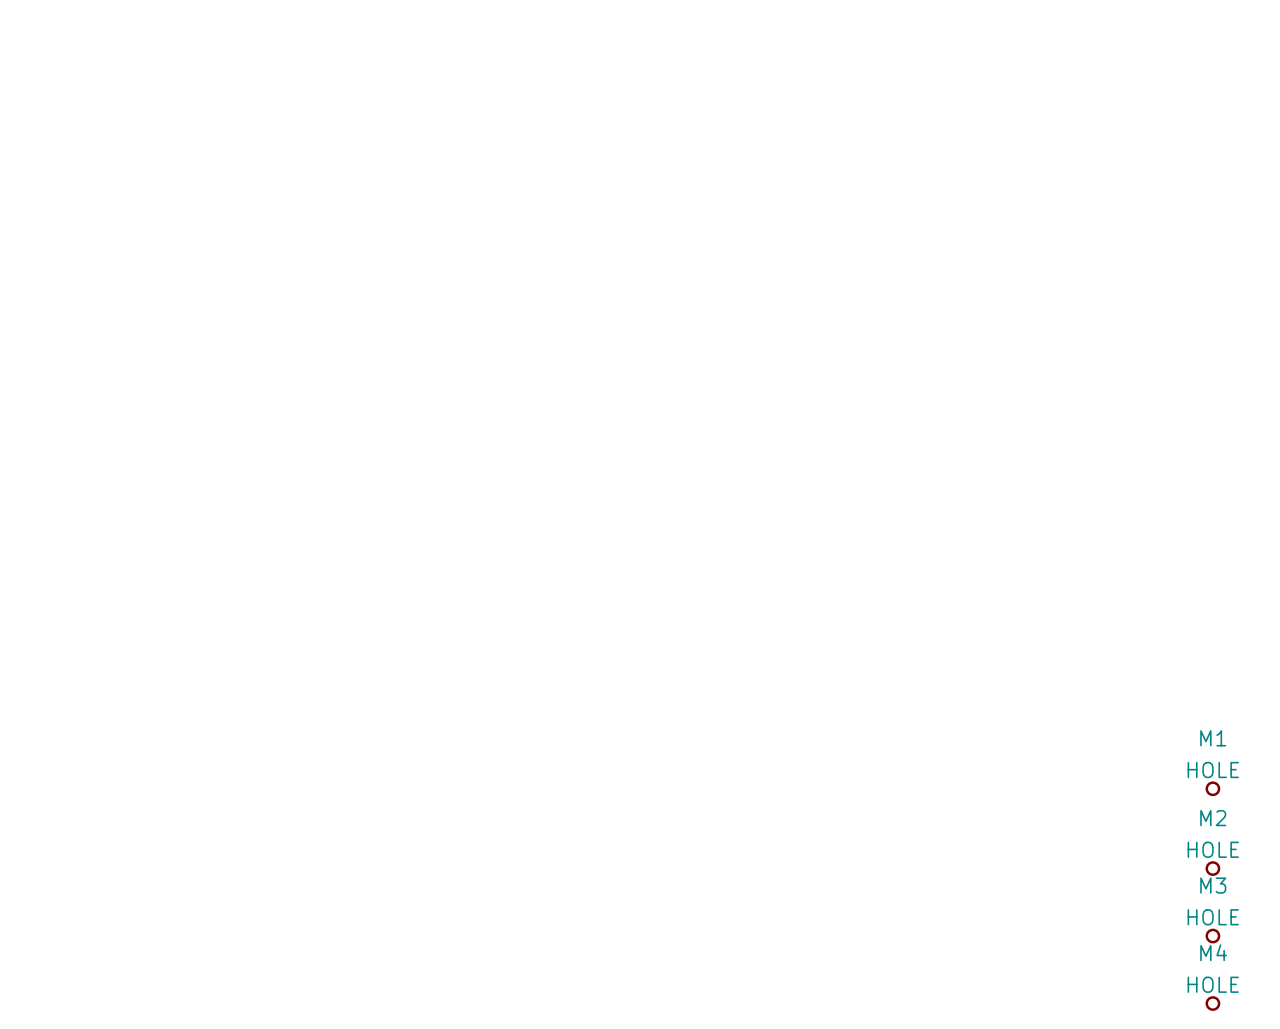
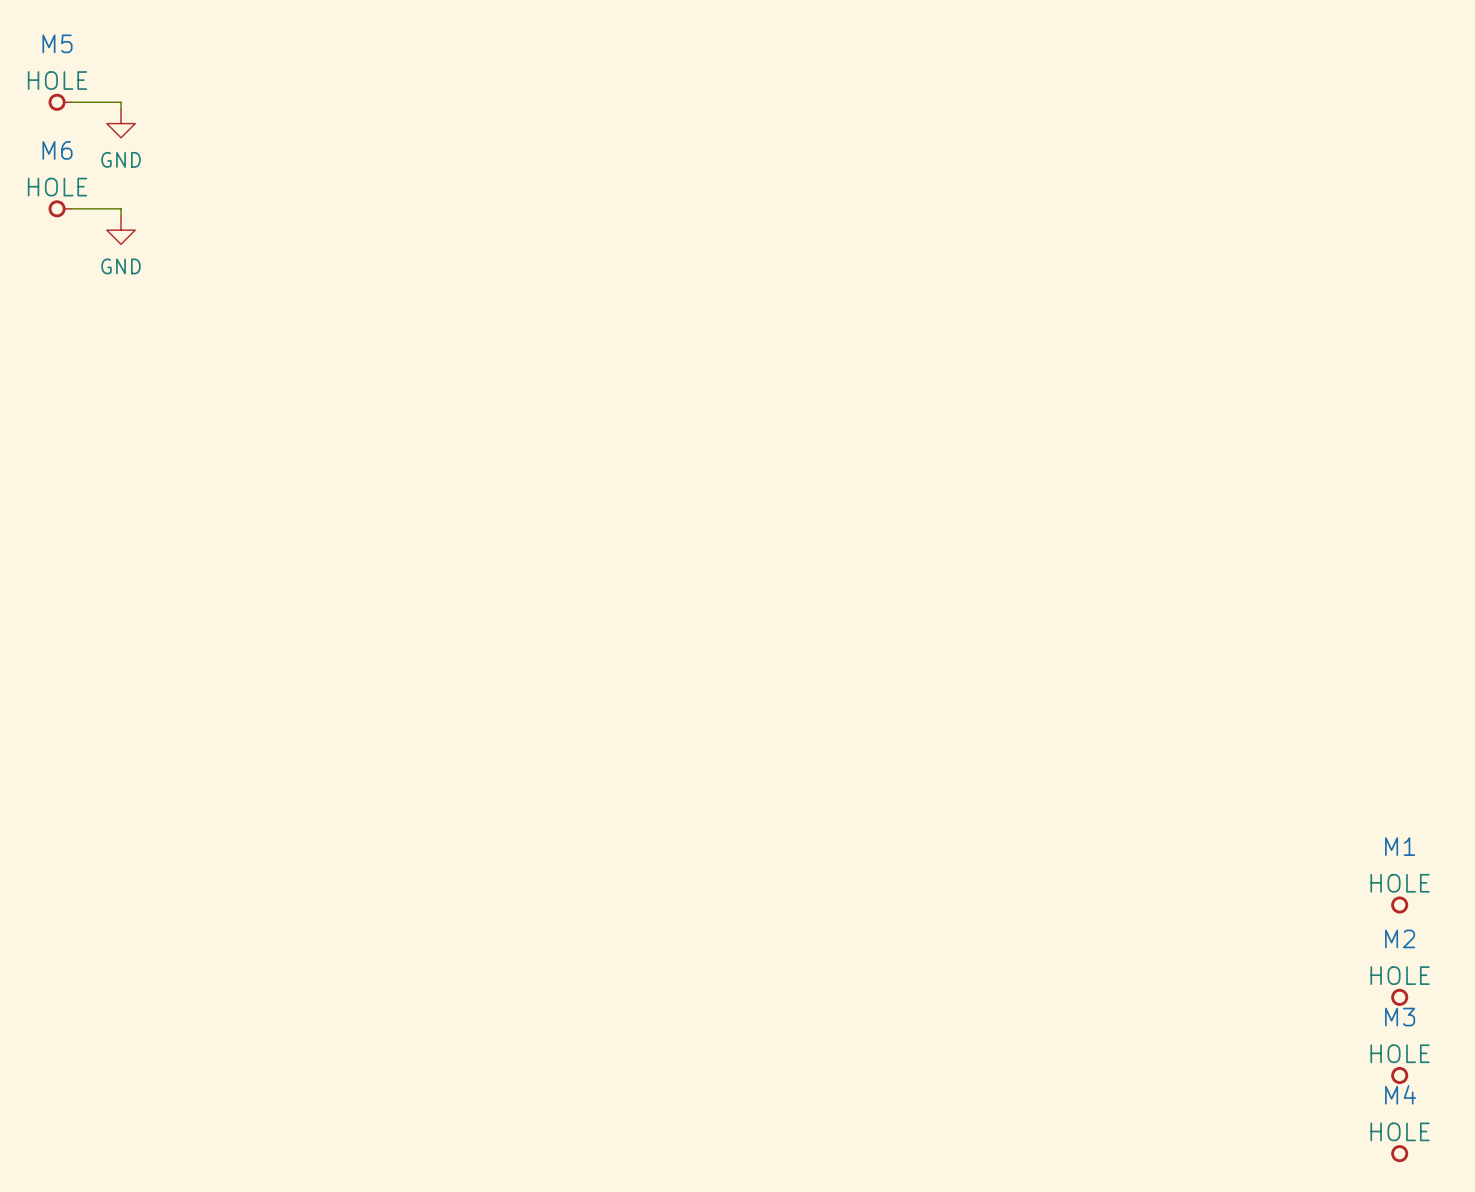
M5: none -> HOLE (59, 102)
wire: none -> (71, 102) (121, 102) (121, 109)
power symbol: none -> GND (121, 123)
M6: none -> HOLE (59, 208)
wire: none -> (71, 208) (121, 208) (121, 215)
power symbol: none -> GND (121, 230)

